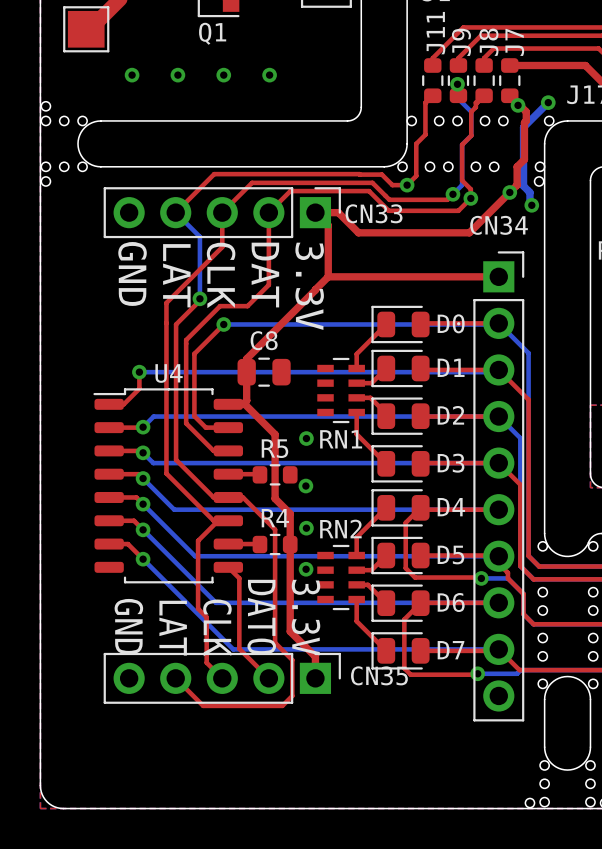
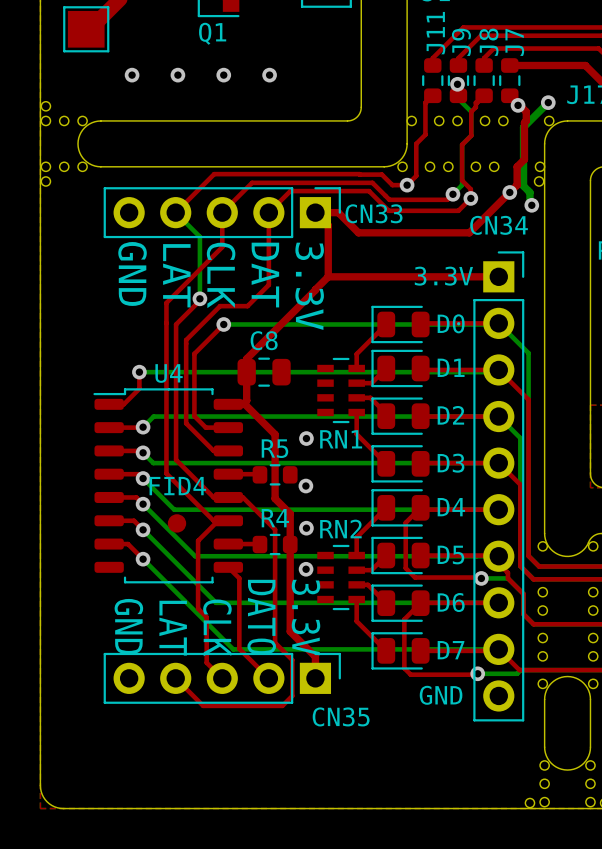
text: none -> 3.3V (443, 276)
FID4: none -> (177, 523)
CN35 name position: CN35 (379, 675) -> CN35 (341, 716)
text: none -> GND (441, 695)

